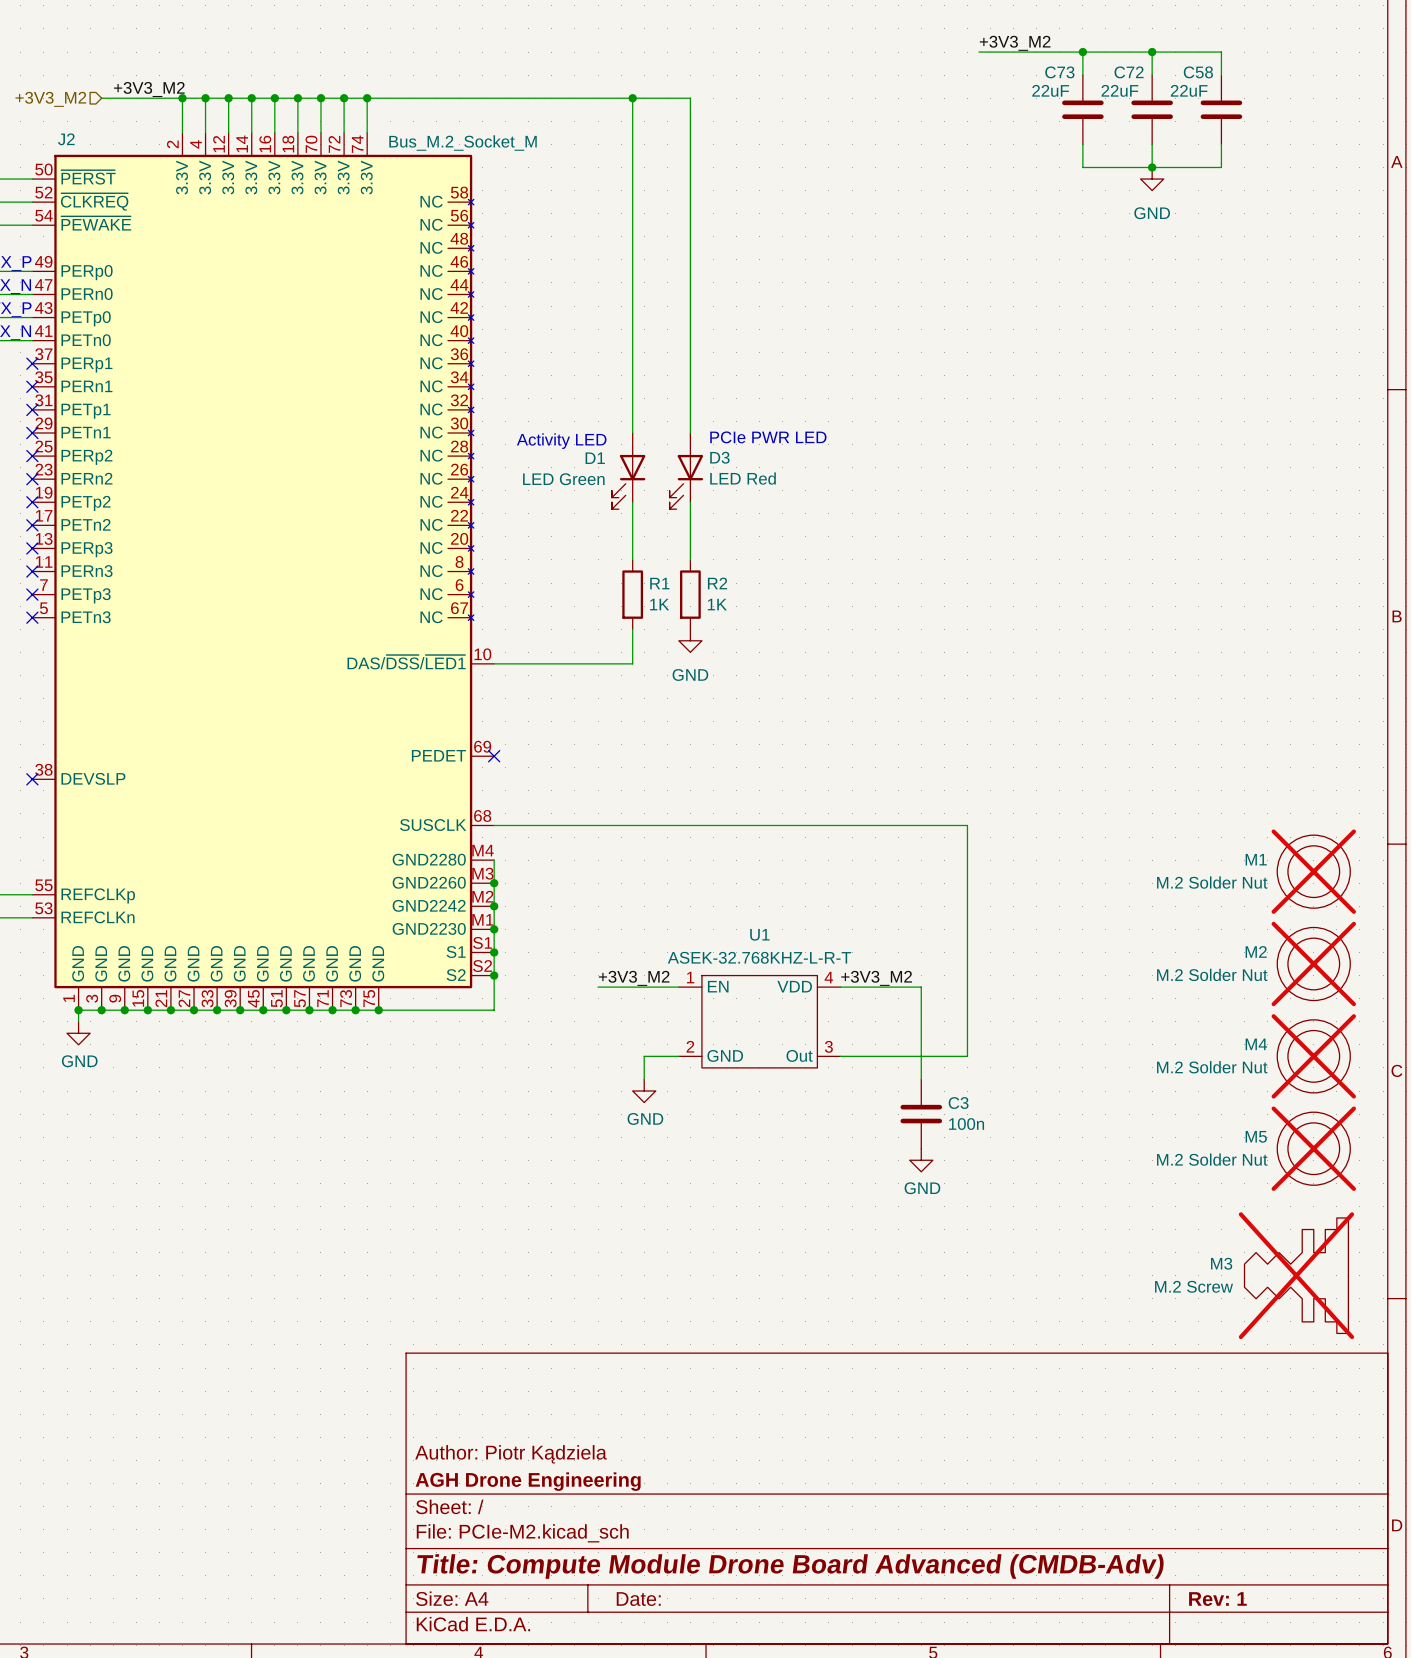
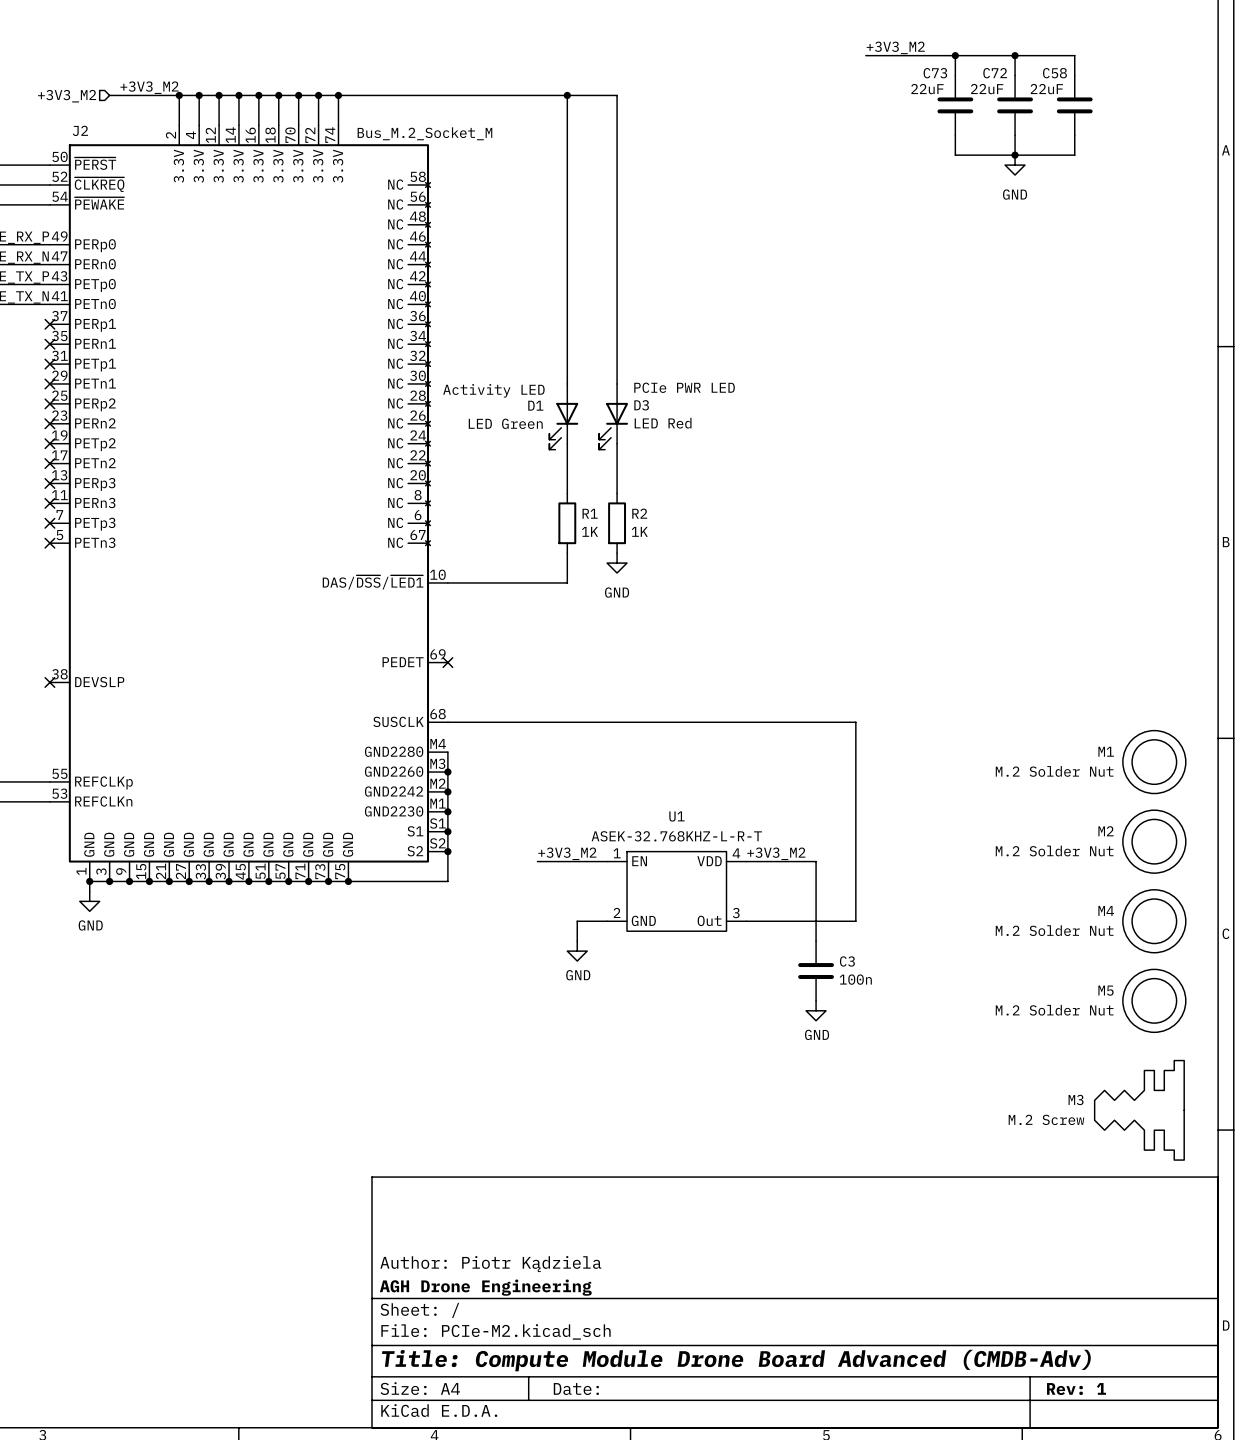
M1 do-not-place cross: (1313, 871) -> none
M2 do-not-place cross: (1313, 964) -> none
M4 do-not-place cross: (1313, 1056) -> none
M5 do-not-place cross: (1313, 1148) -> none
M3 do-not-place cross: (1296, 1275) -> none

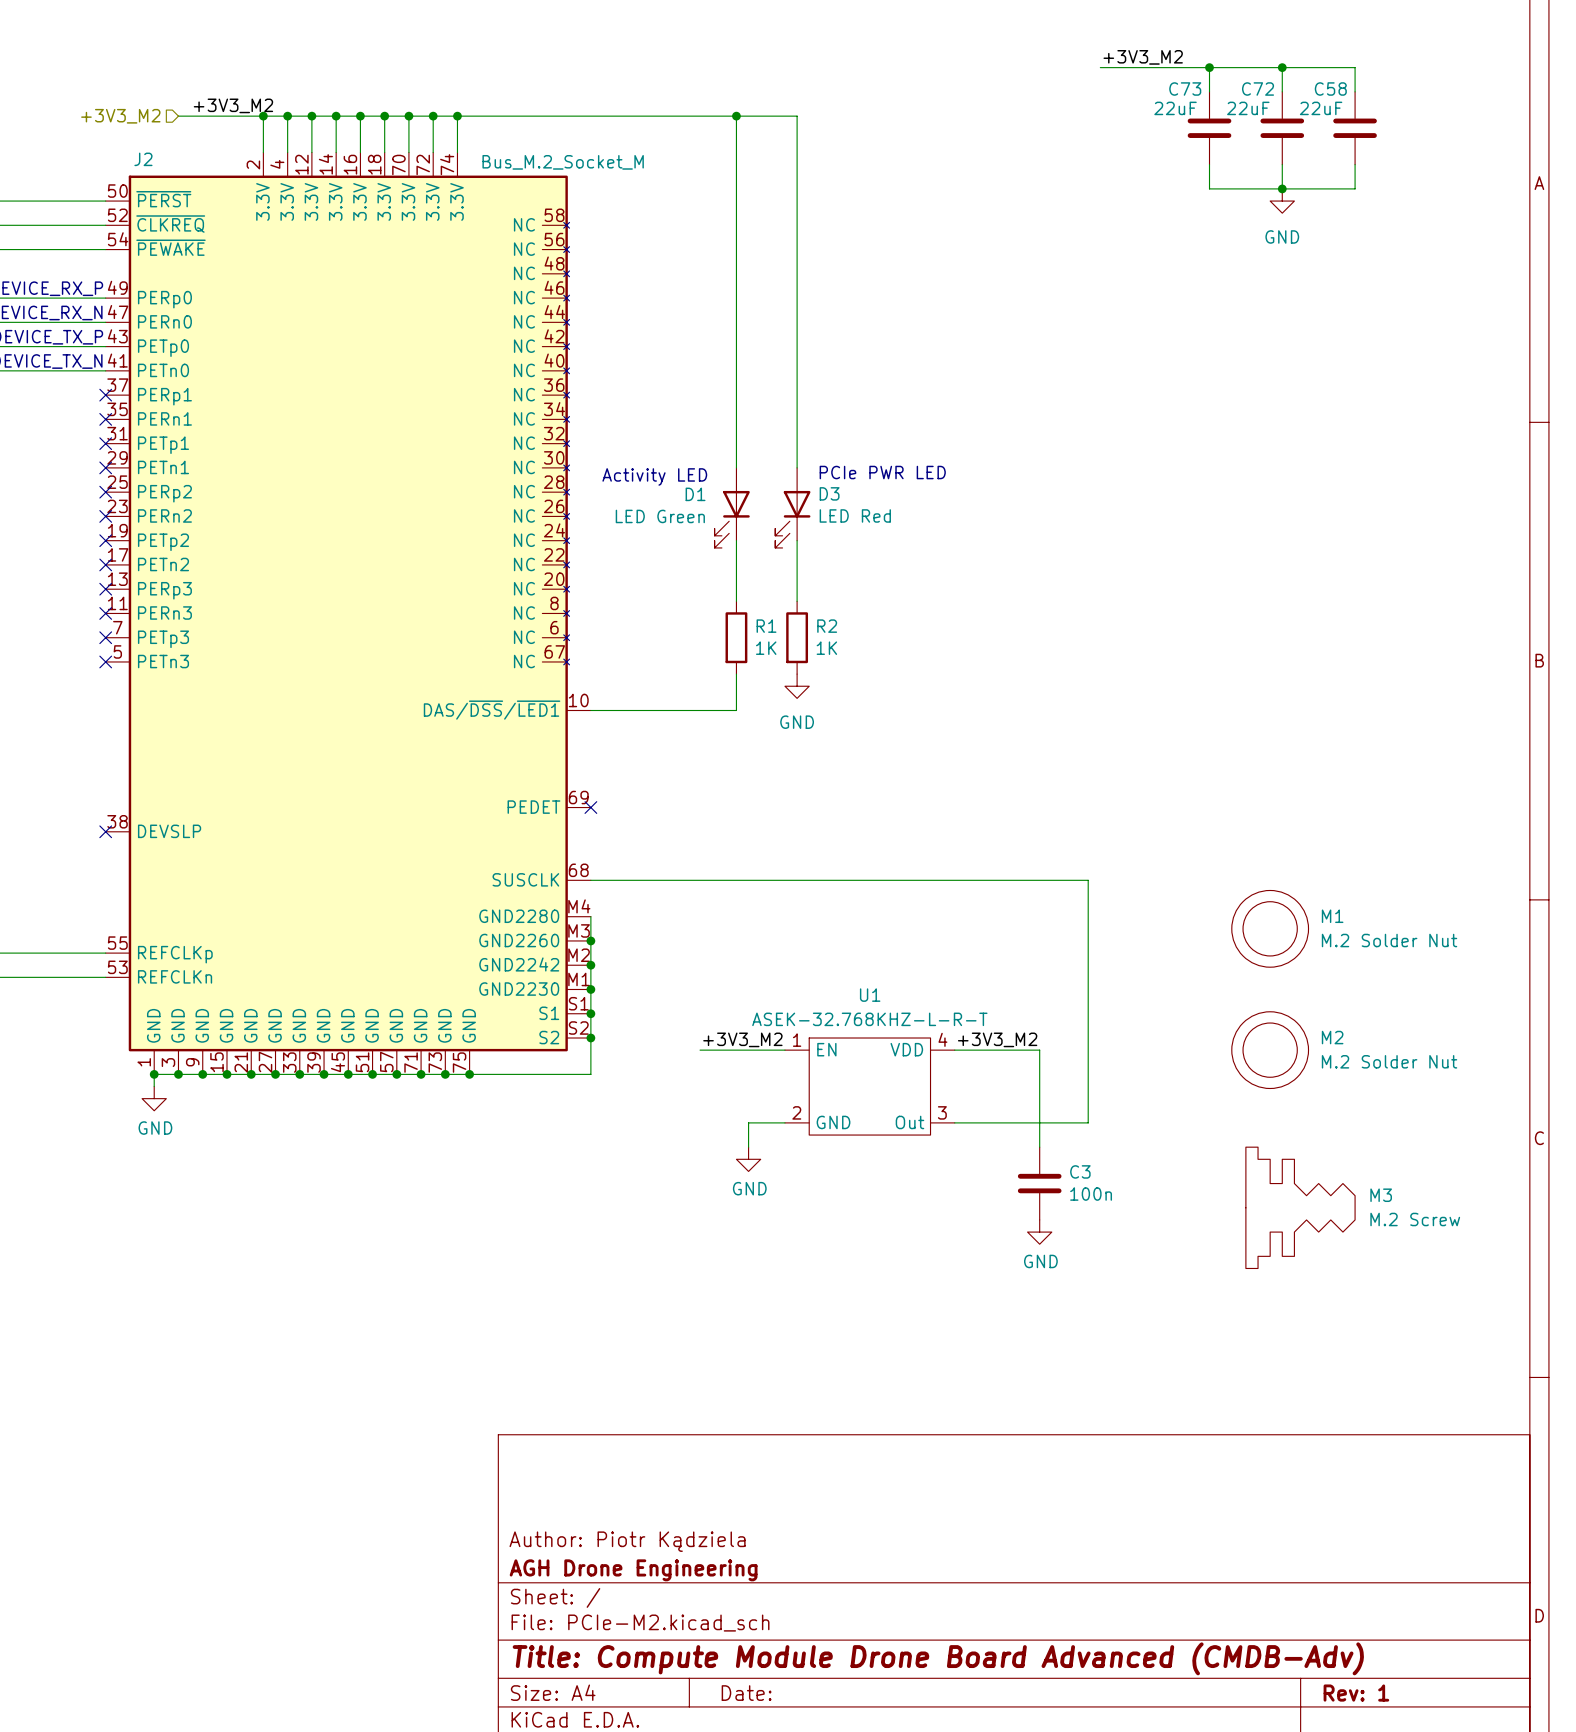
M1 name position: M1 (1106, 751) -> M1 (1332, 916)
M1 position: (1154, 762) -> (1270, 928)
M1 value position: M.2 Solder Nut (1054, 771) -> M.2 Solder Nut (1389, 940)
M2 name position: M2 (1106, 831) -> M2 (1332, 1037)
M2 position: (1154, 841) -> (1270, 1050)
M2 value position: M.2 Solder Nut (1054, 851) -> M.2 Solder Nut (1389, 1061)
M4: M.2 Solder Nut (1154, 921) -> none
M5: M.2 Solder Nut (1154, 1000) -> none
M3 name position: M3 (1076, 1099) -> M3 (1381, 1195)
M3 rotation: 0° (1139, 1110) -> 180° (1300, 1207)
M3 position: (1139, 1110) -> (1300, 1207)
M3 value position: M.2 Screw (1046, 1119) -> M.2 Screw (1415, 1219)

